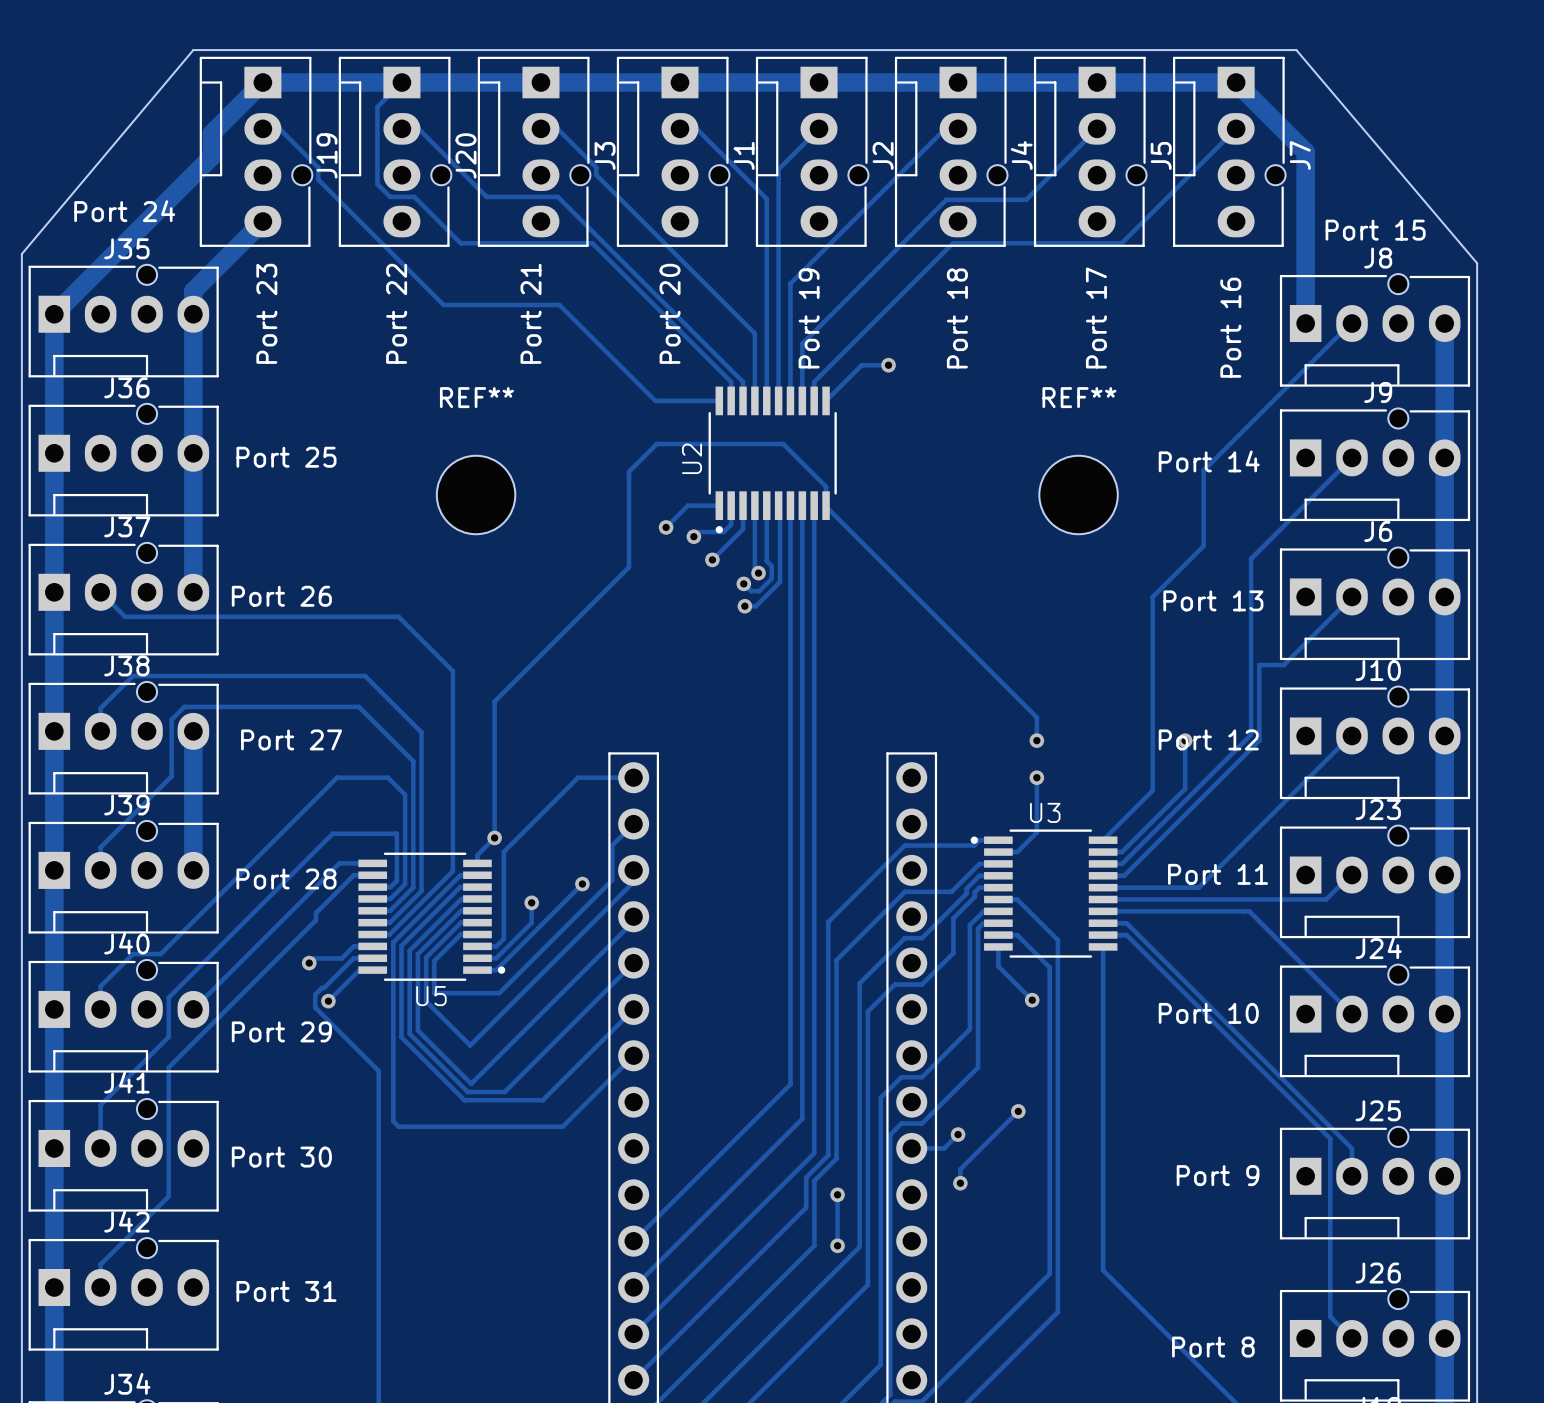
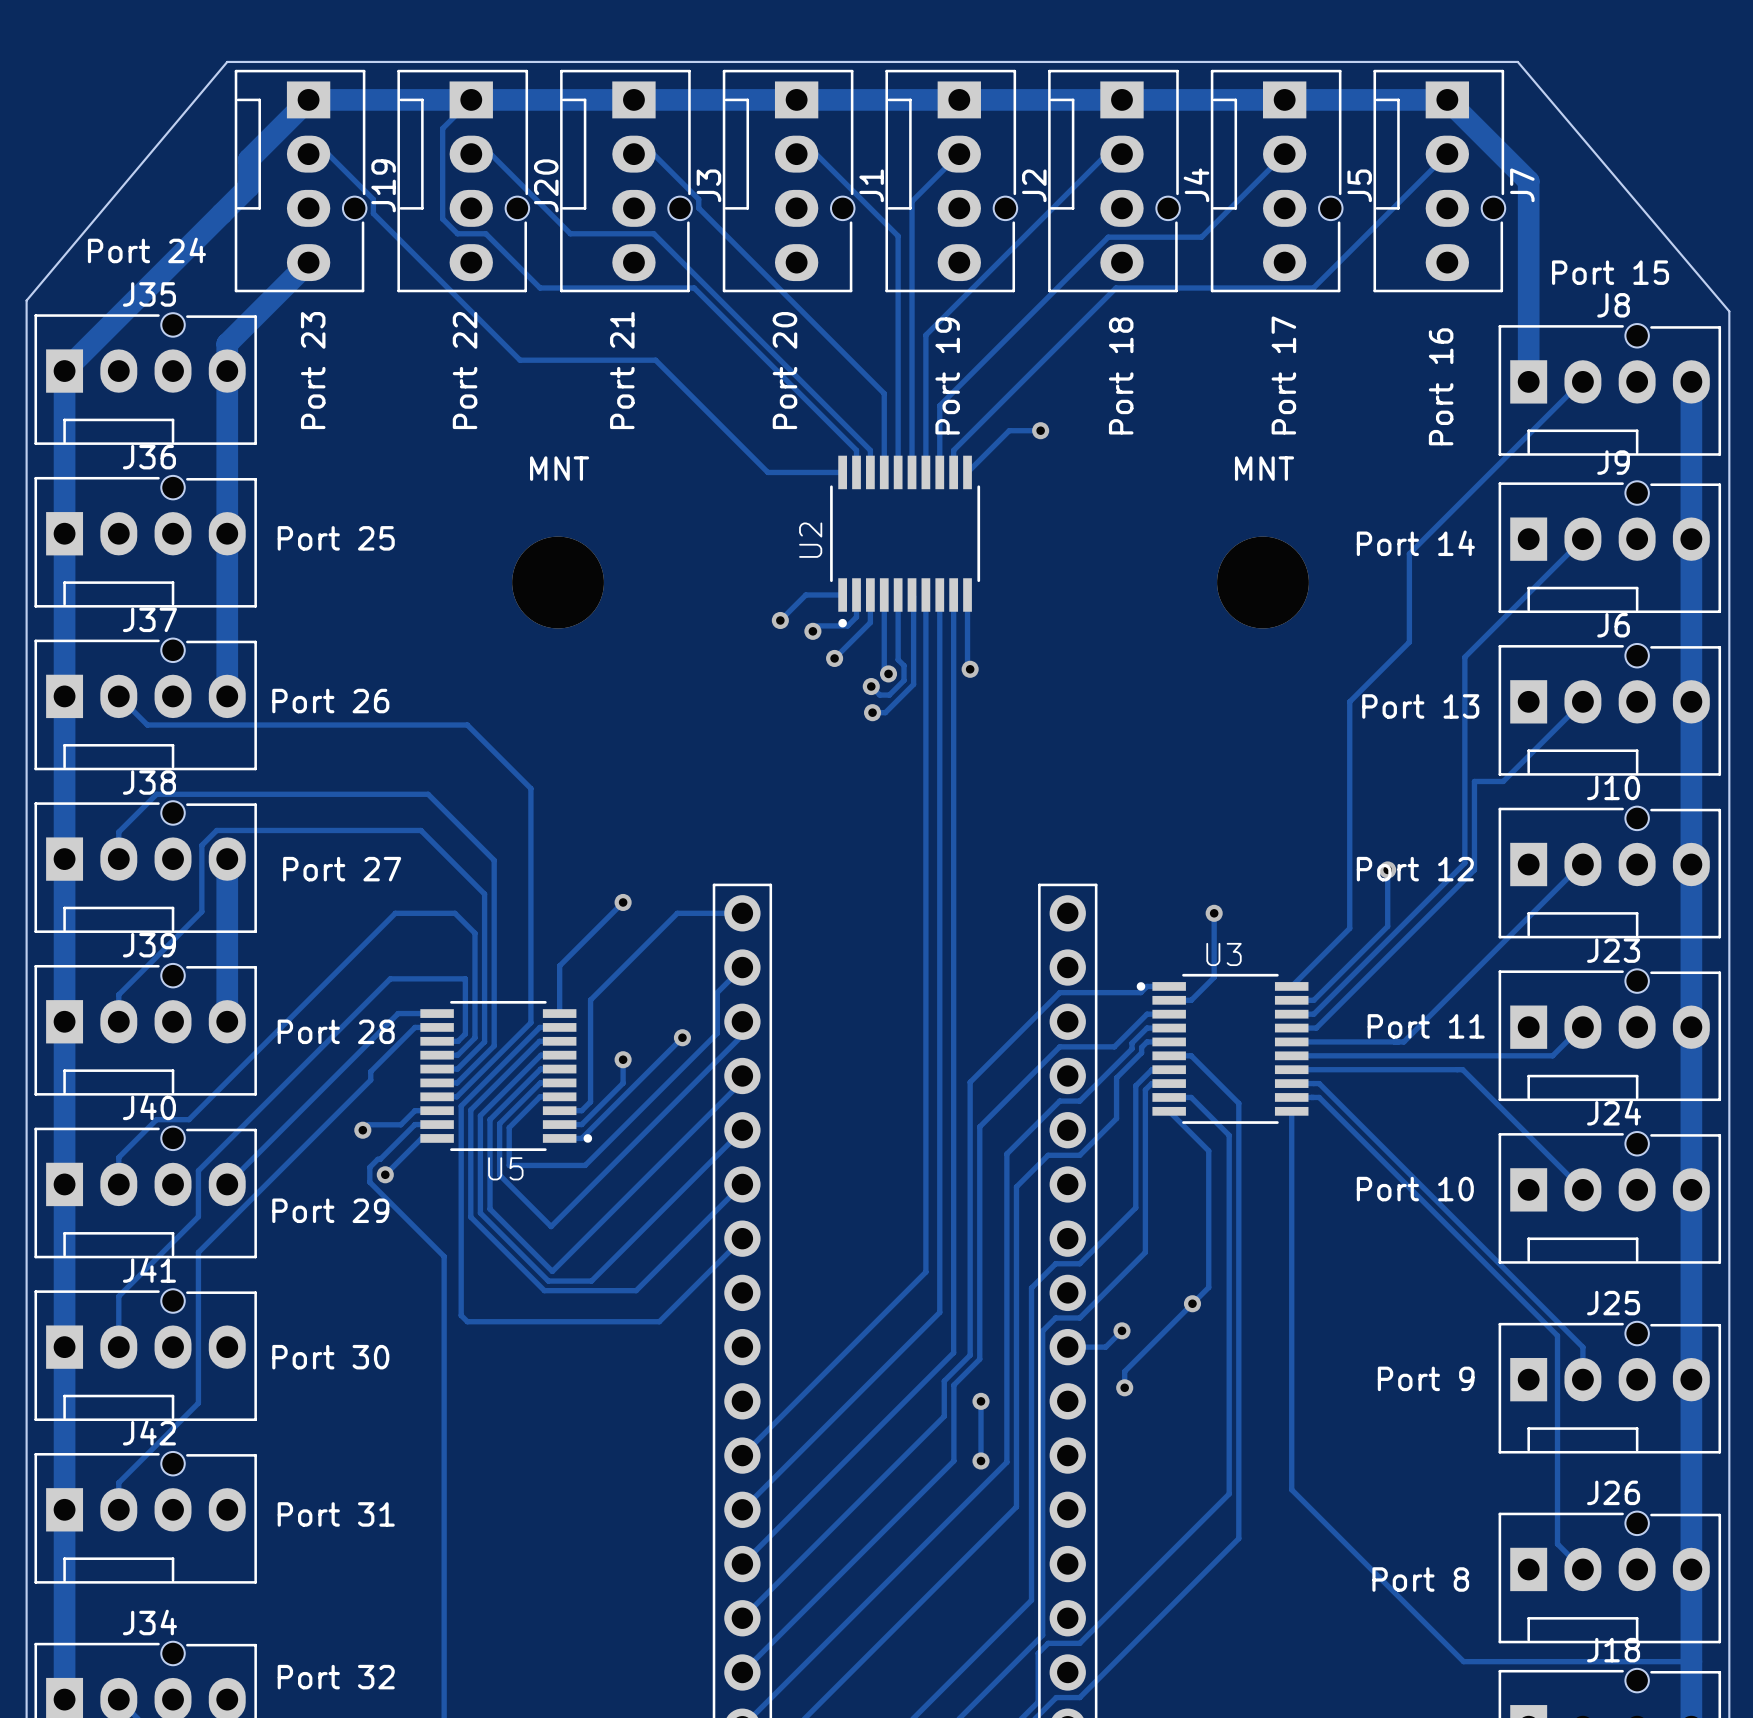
REF**: (476, 494) -> none
MNT: none -> (558, 582)
REF**: (1078, 494) -> none
MNT: none -> (1262, 582)
track: (826, 505) (826, 486) (783, 444) (656, 444) (629, 471) (629, 567) (494, 701) (494, 837) (477, 855) -> (623, 902) (559, 965) (559, 1003)
track: (826, 506) (1036, 717) (1036, 740) -> (967, 596) (967, 666) (970, 669)
via: none -> (970, 669)
via: (1036, 740) -> none
via position: (494, 837) -> (623, 902)
track: (998, 946) (998, 966) (1032, 1000) -> (1169, 1111) (1208, 1150) (1208, 1287) (1192, 1303)
via: (1032, 1000) -> none

